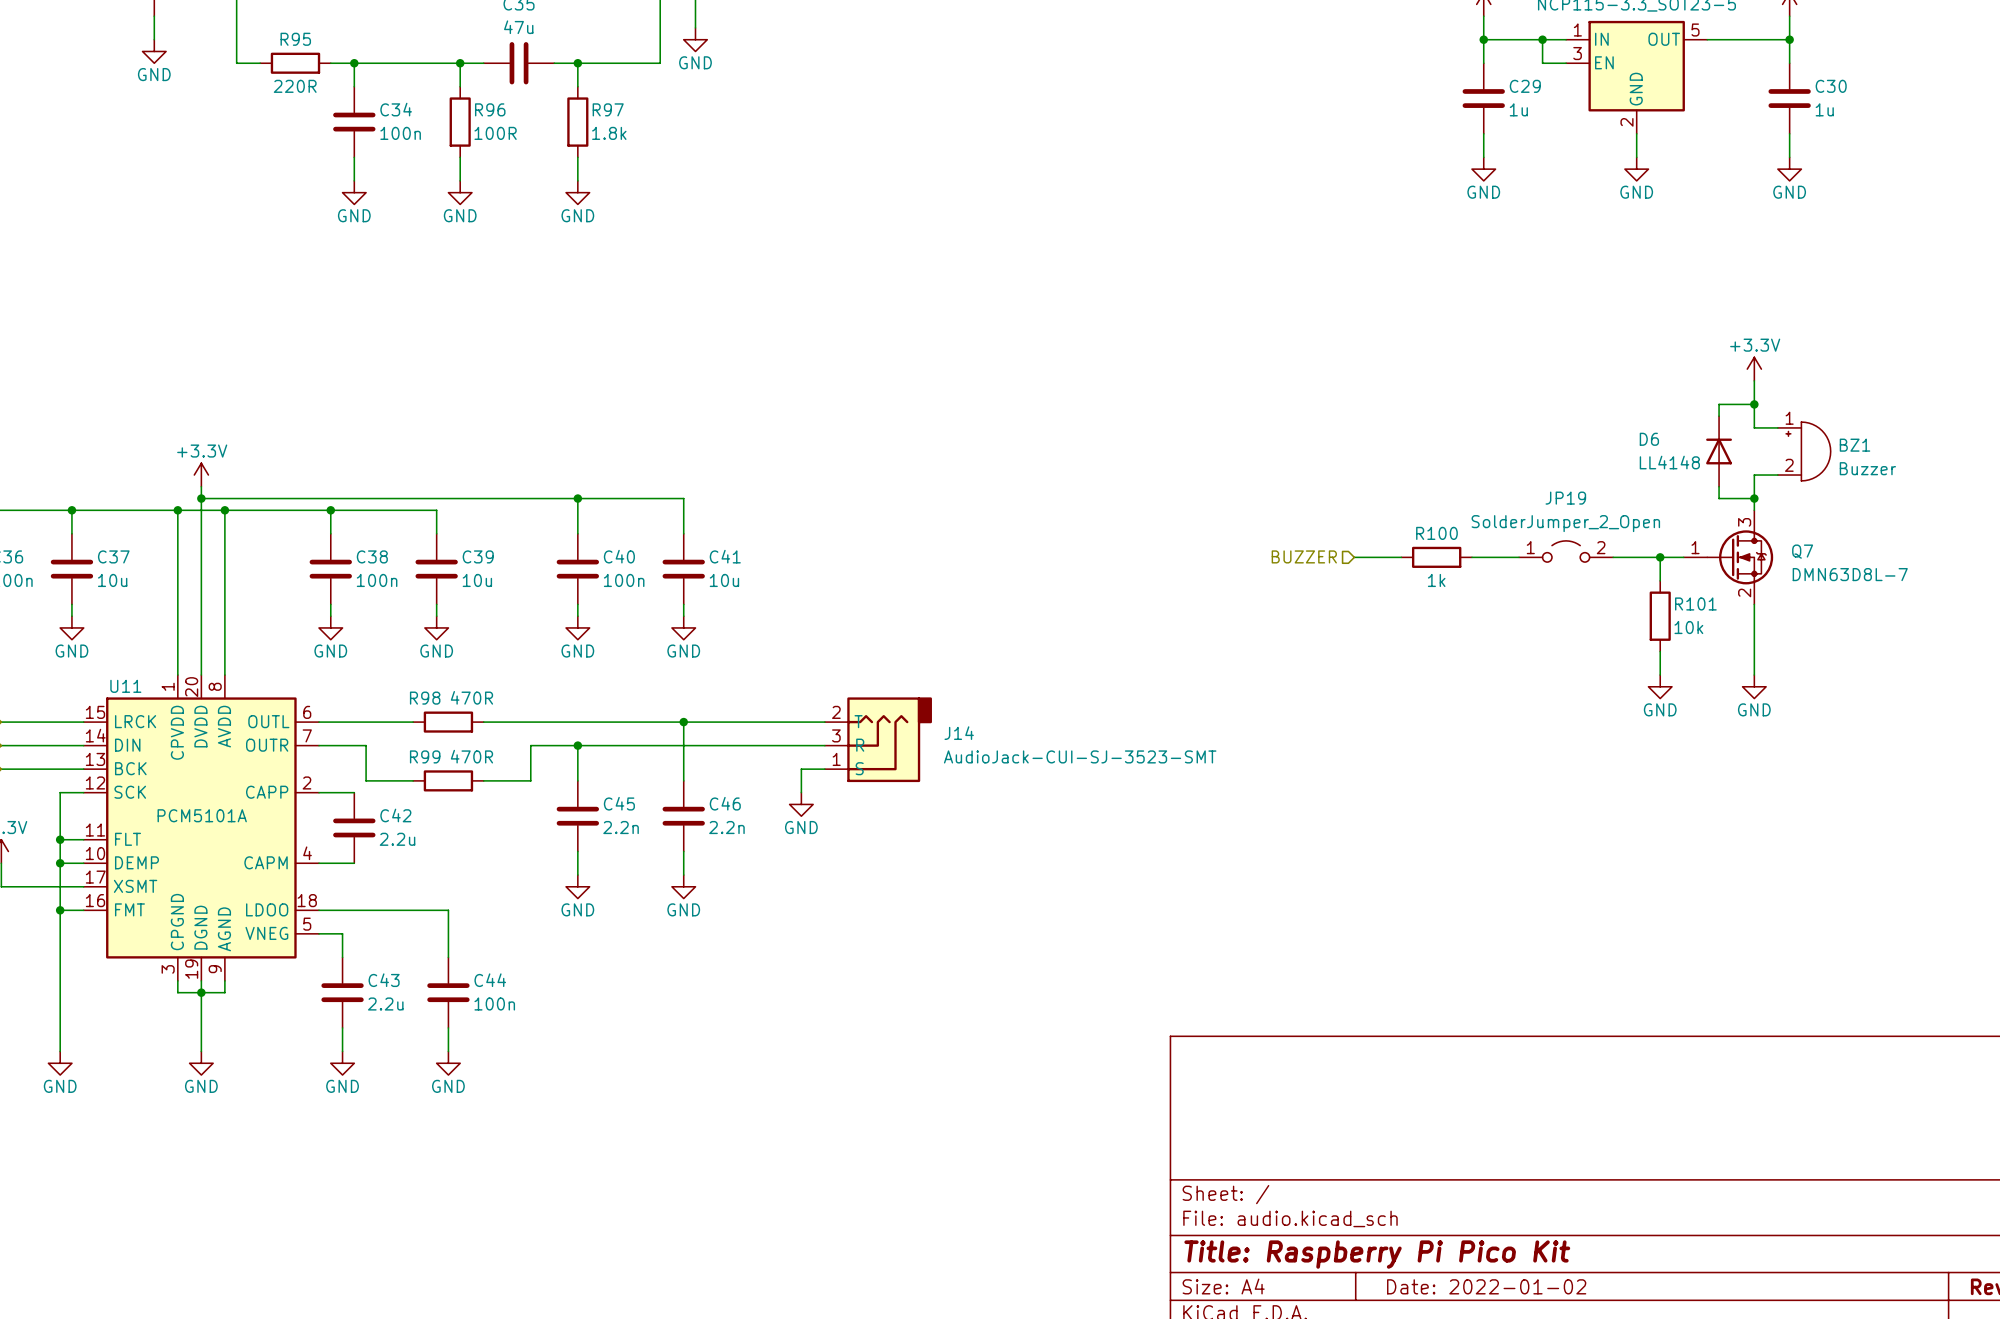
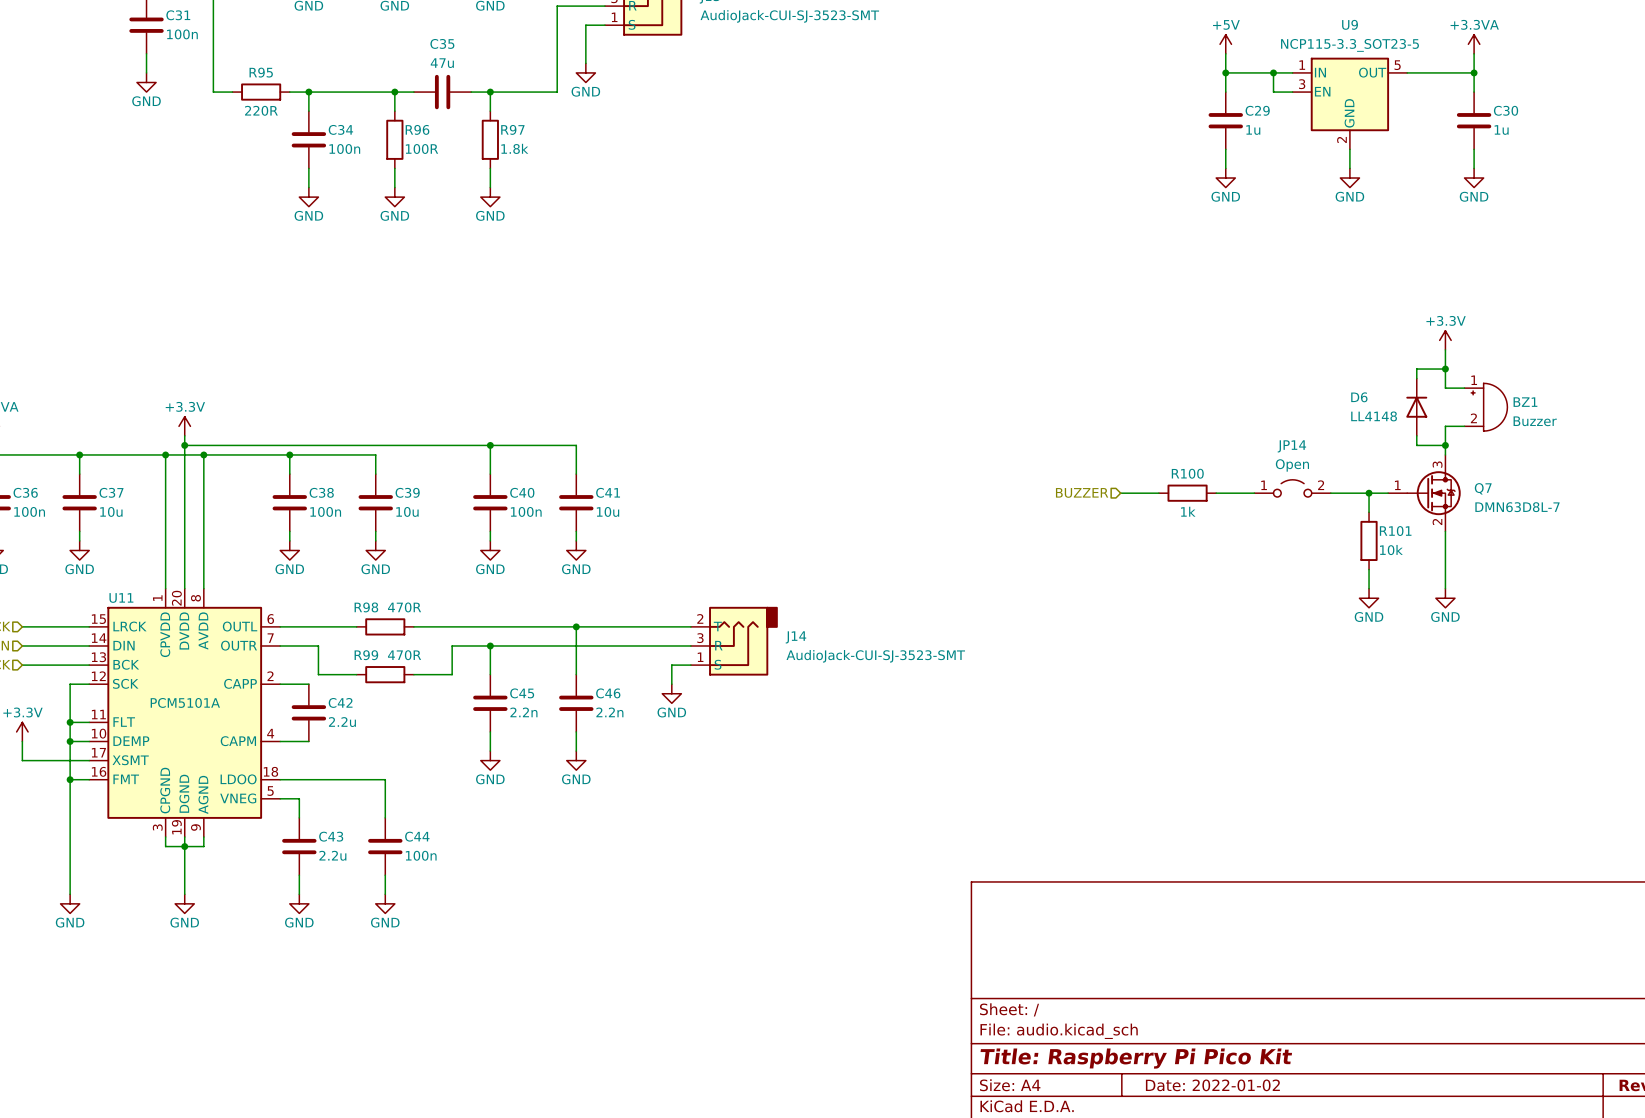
JP19 name: JP19 (1565, 498) -> JP14 (1291, 446)
JP19 value: SolderJumper_2_Open (1565, 523) -> Open (1292, 465)

